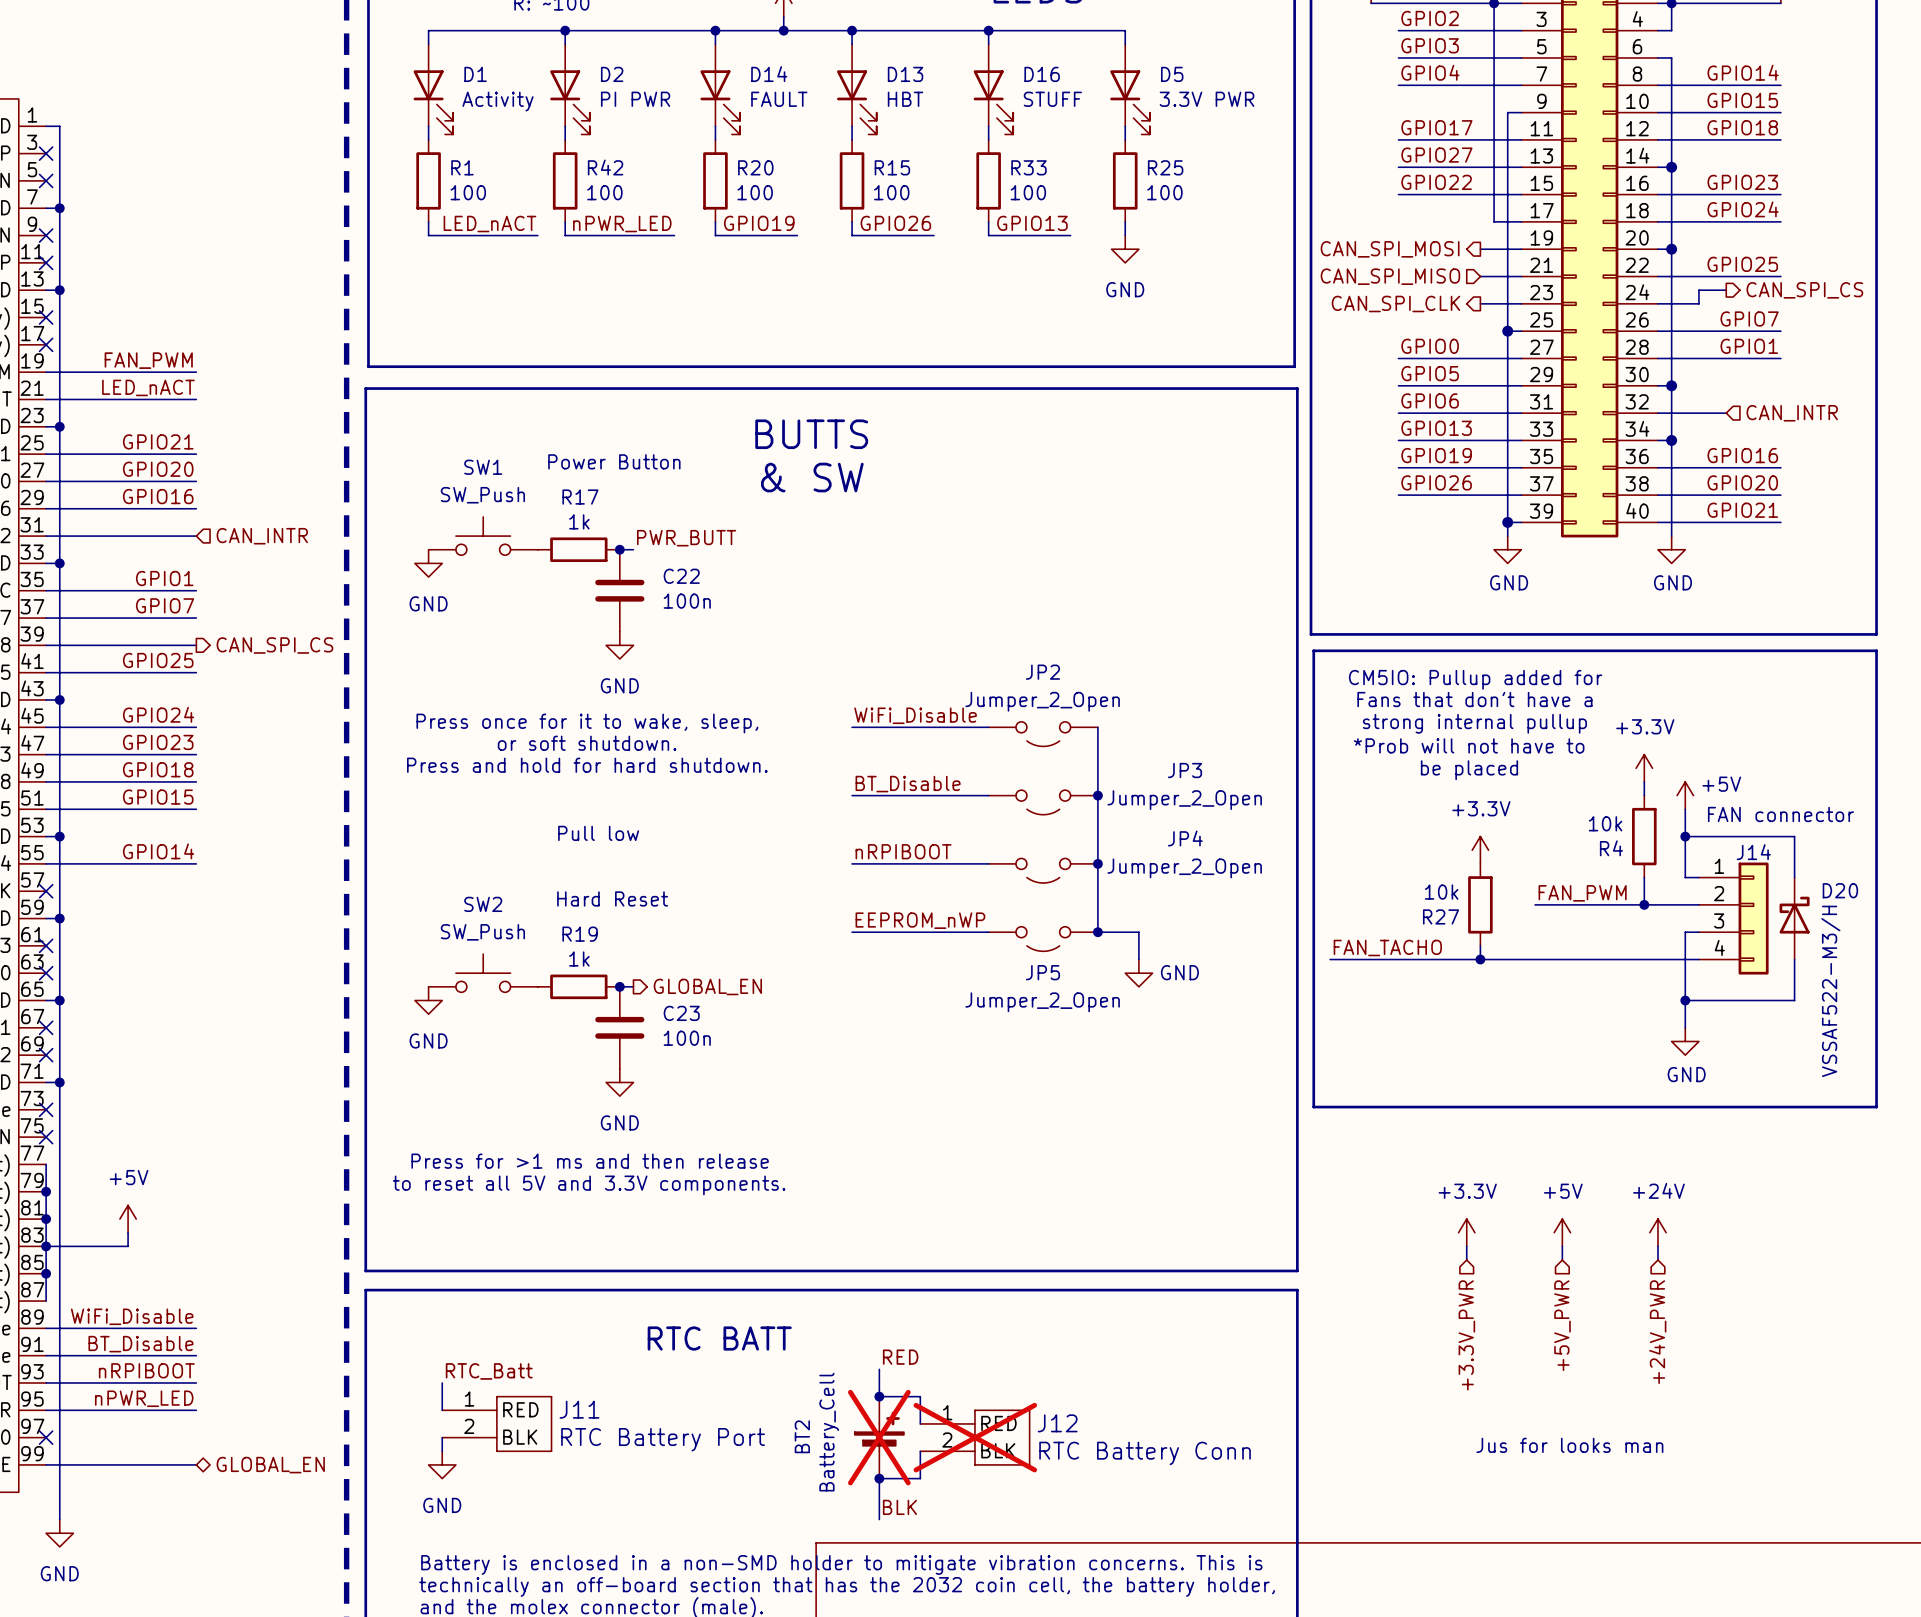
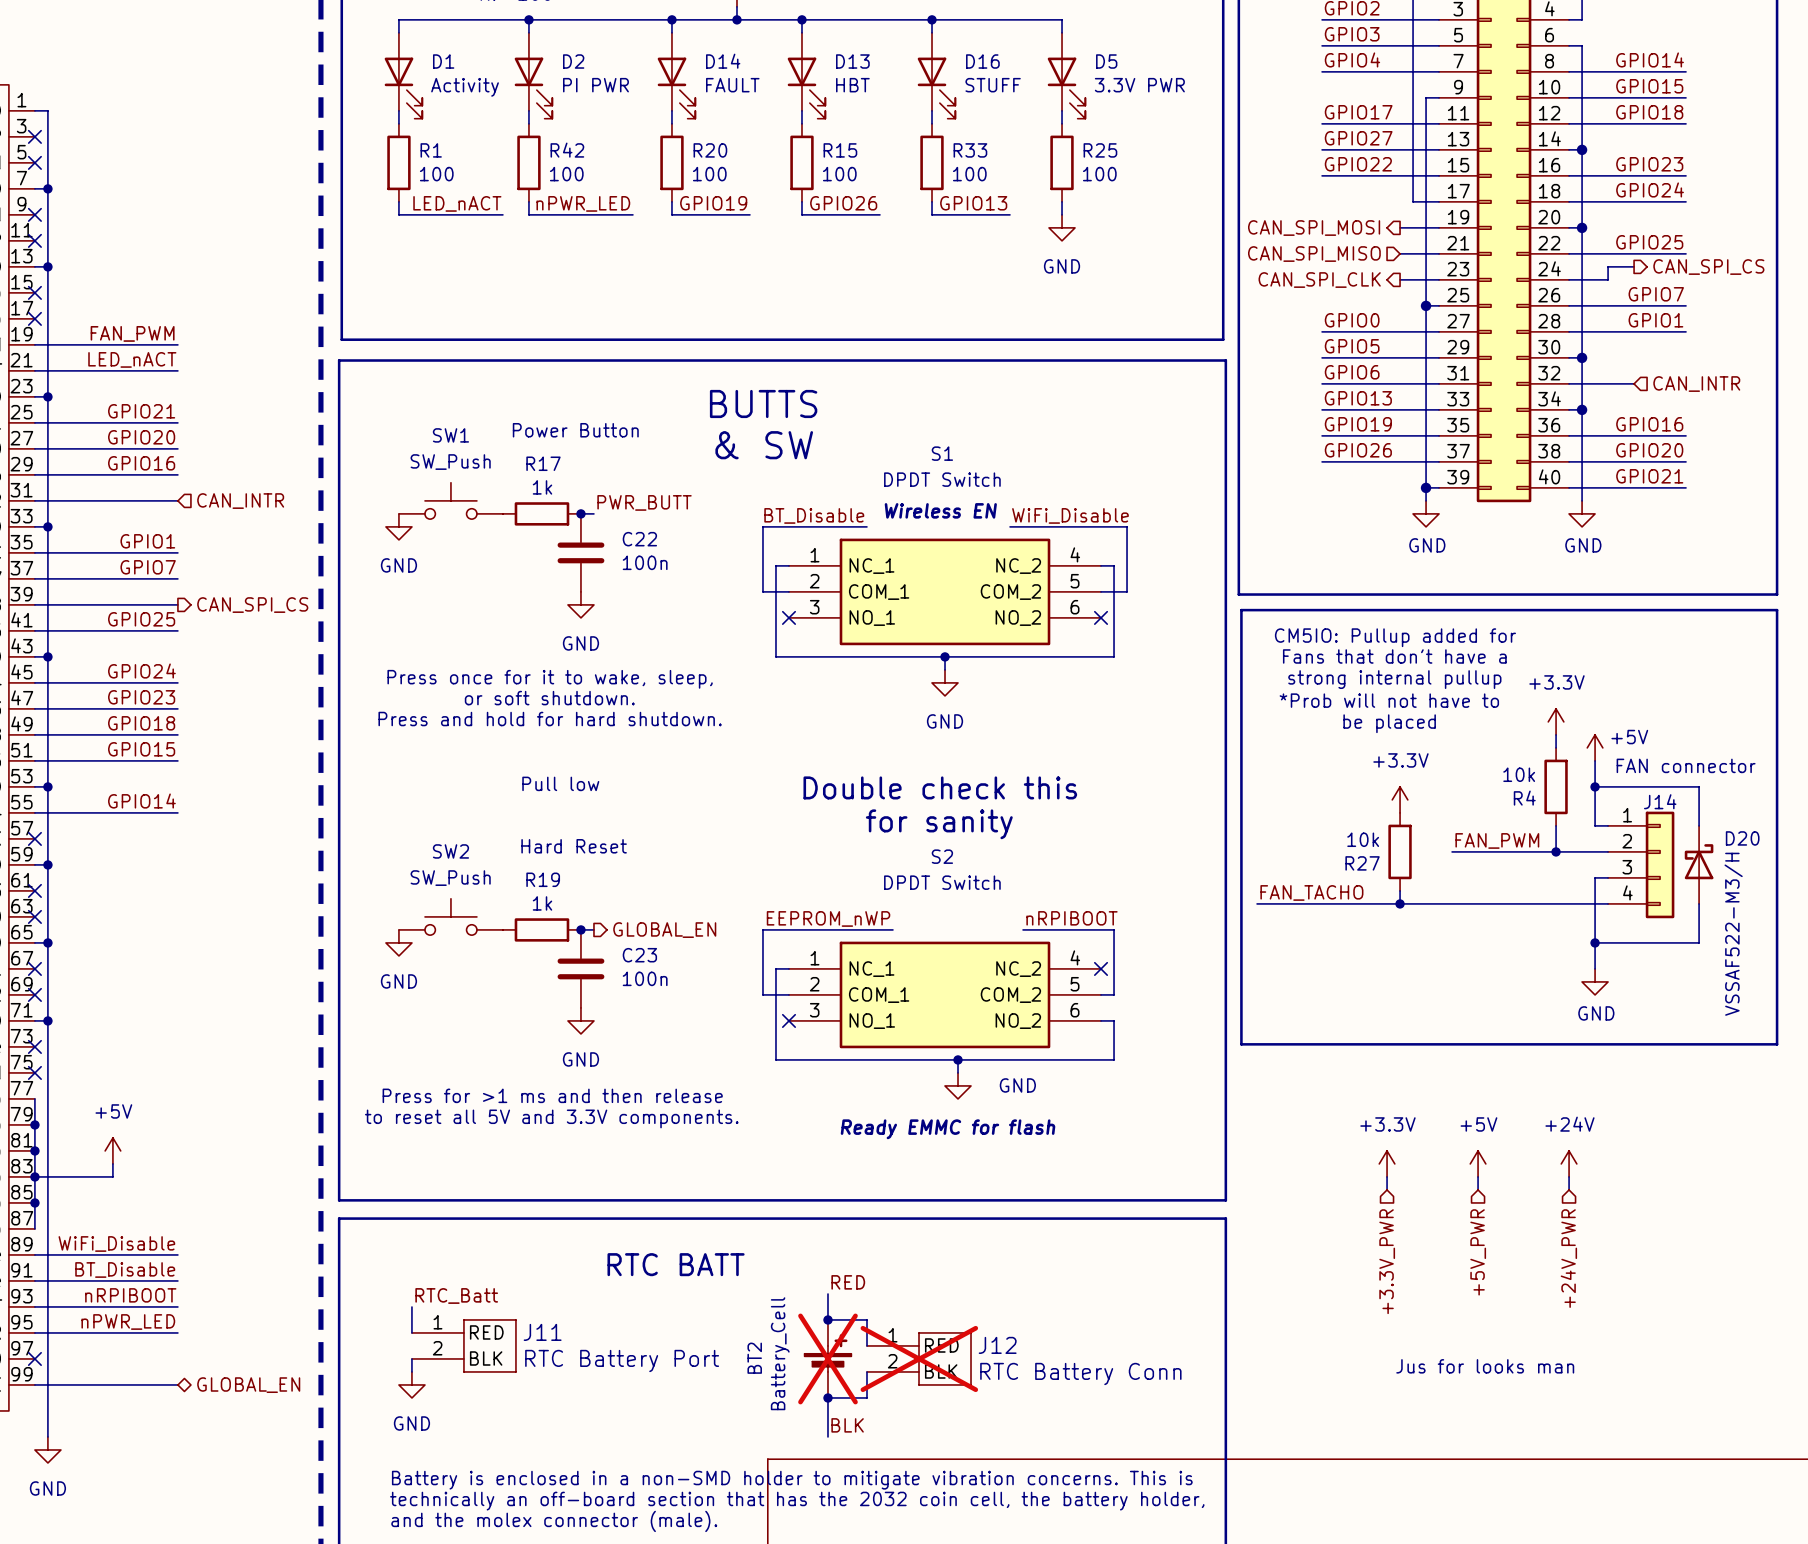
text: none -> Wireless EN (940, 510)
label: none -> WiFi_Disable (1070, 515)
wire: none -> (867, 526) (762, 526) (762, 591) (788, 591)
wire: none -> (1010, 526) (1127, 526) (1127, 591) (1101, 591)
wire: none -> (788, 565) (775, 565) (775, 656) (1114, 656) (1114, 565) (1101, 565)
S1: none -> DPDT Switch (945, 591)
no-connect mark: none -> (788, 617)
no-connect mark: none -> (1101, 617)
junction: none -> (945, 656)
label: WiFi_Disable (915, 715) -> none
wire: (852, 727) (988, 727) -> none
power symbol: none -> GND (945, 682)
wire: (1097, 727) (1097, 932) (1138, 932) (1138, 959) -> none
JP2: Jumper_2_Open (1043, 734) -> none
label position: BT_Disable (908, 784) -> BT_Disable (814, 515)
wire: (852, 795) (988, 795) -> none
junction: (1097, 795) -> none
JP3: Jumper_2_Open (1043, 802) -> none
text: none -> Double check this (940, 787)
label position: nRPIBOOT (903, 851) -> nRPIBOOT (1072, 918)
wire: (852, 863) (988, 863) -> none
junction: (1097, 863) -> none
JP4: Jumper_2_Open (1043, 870) -> none
text: none -> for sanity (939, 824)
label position: EEPROM_nWP (920, 920) -> EEPROM_nWP (828, 918)
wire: (852, 932) (988, 932) -> none
junction: (1097, 932) -> none
JP5: Jumper_2_Open (1043, 939) -> none
power symbol: GND (1138, 973) -> none
wire: none -> (893, 929) (762, 929) (762, 994) (788, 994)
wire: none -> (1023, 929) (1114, 929) (1114, 994) (1101, 994)
wire: none -> (788, 968) (775, 968) (775, 1059) (1114, 1059) (1114, 1020) (1101, 1020)
no-connect mark: none -> (1101, 968)
S2: none -> DPDT Switch (945, 994)
no-connect mark: none -> (788, 1020)
wire: none -> (958, 1059) (958, 1072)
junction: none -> (958, 1059)
power symbol: none -> GND (958, 1085)
text: none -> Ready EMMC for flash (948, 1129)

